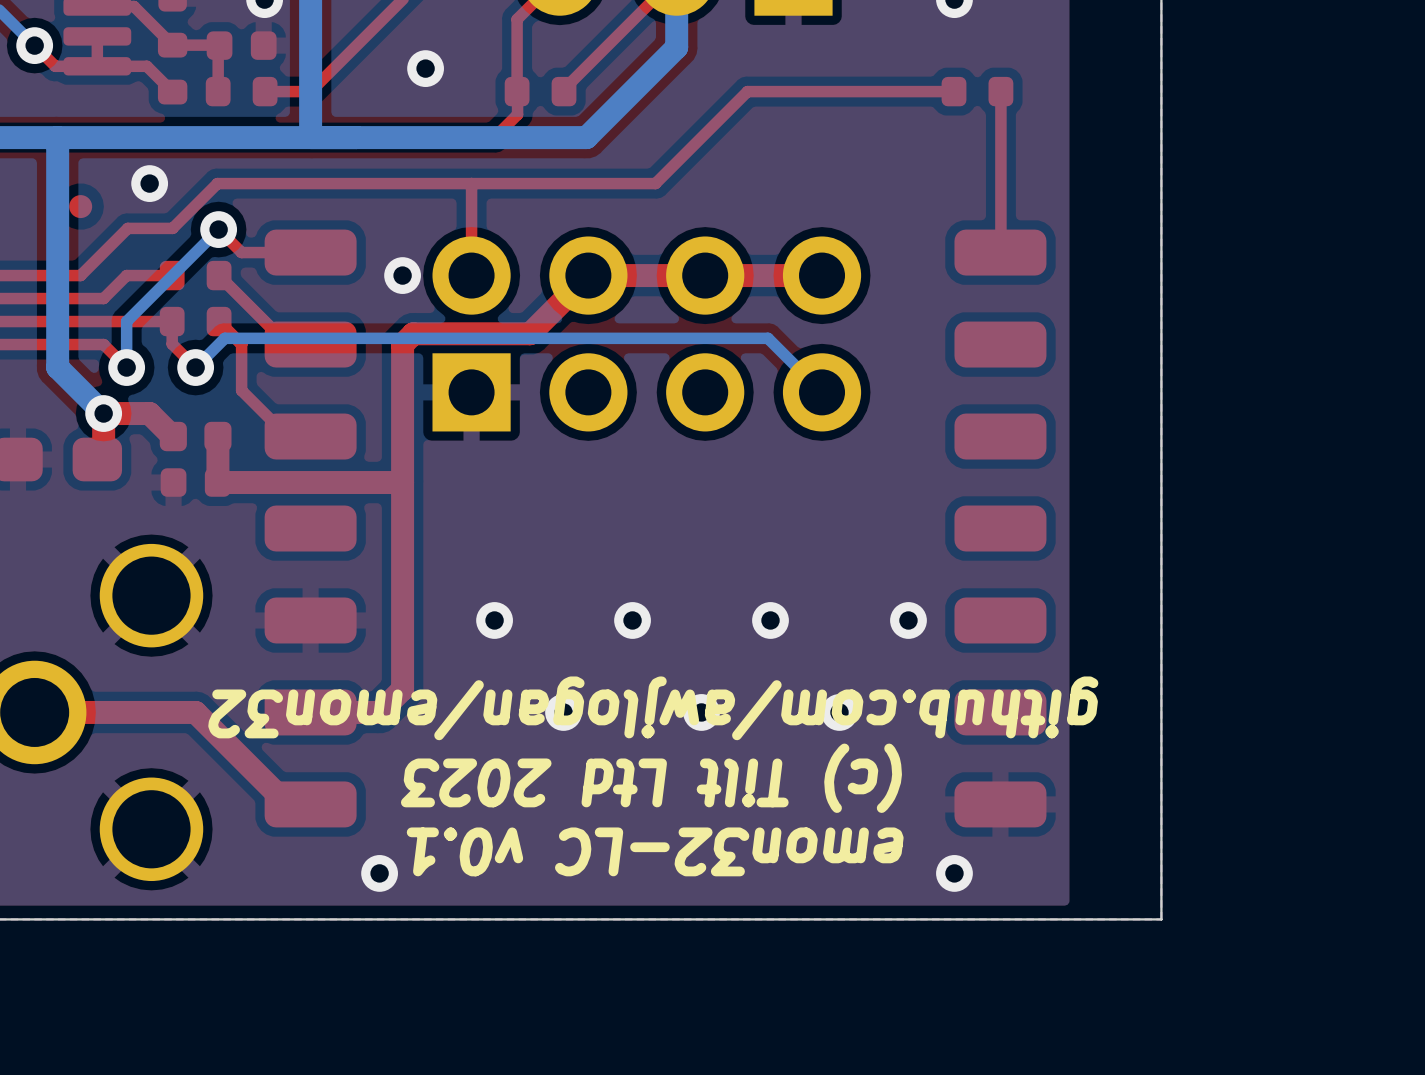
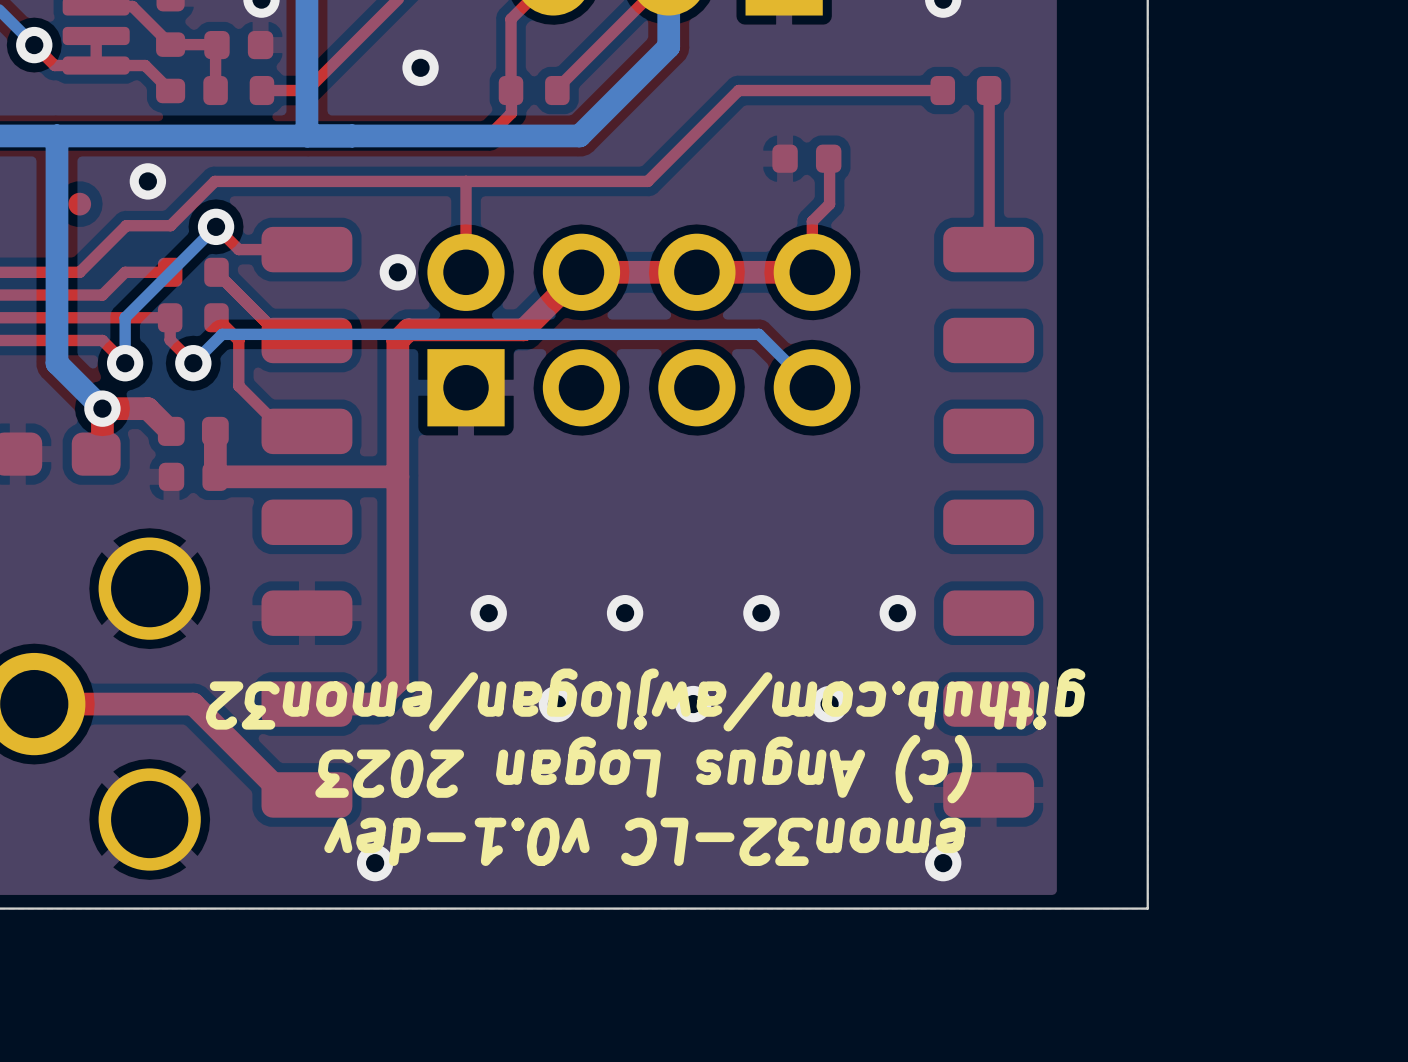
part: none -> (806, 158)
top track: none -> (829, 159) (829, 204) (812, 221) (812, 272)
text: (c) Tilt Ltd 2023 (651, 778) -> (c) Angus Logan 2023 (643, 769)
text: emon32-LC v0.1 (655, 851) -> emon32-LC v0.1-dev (644, 841)

